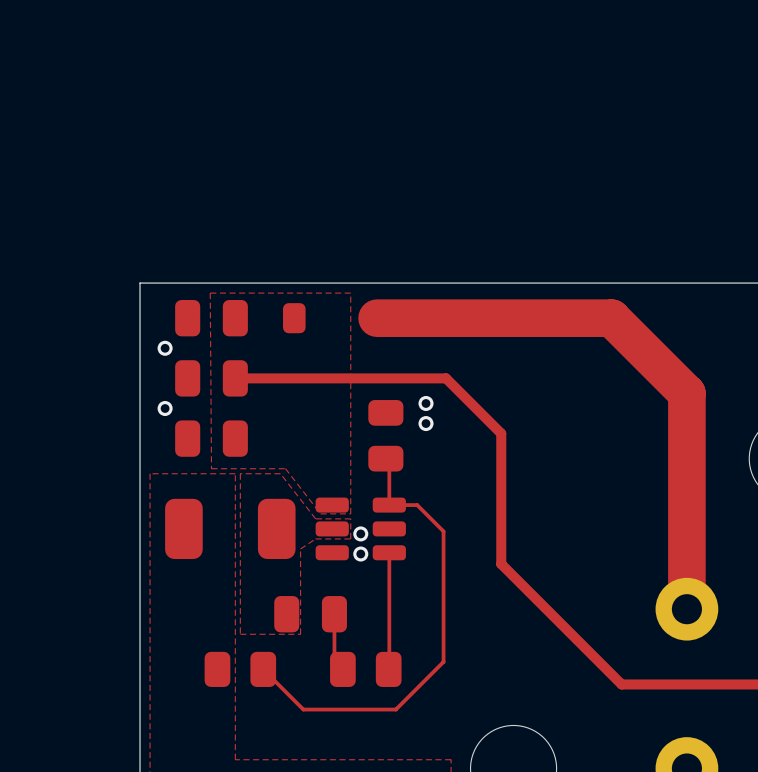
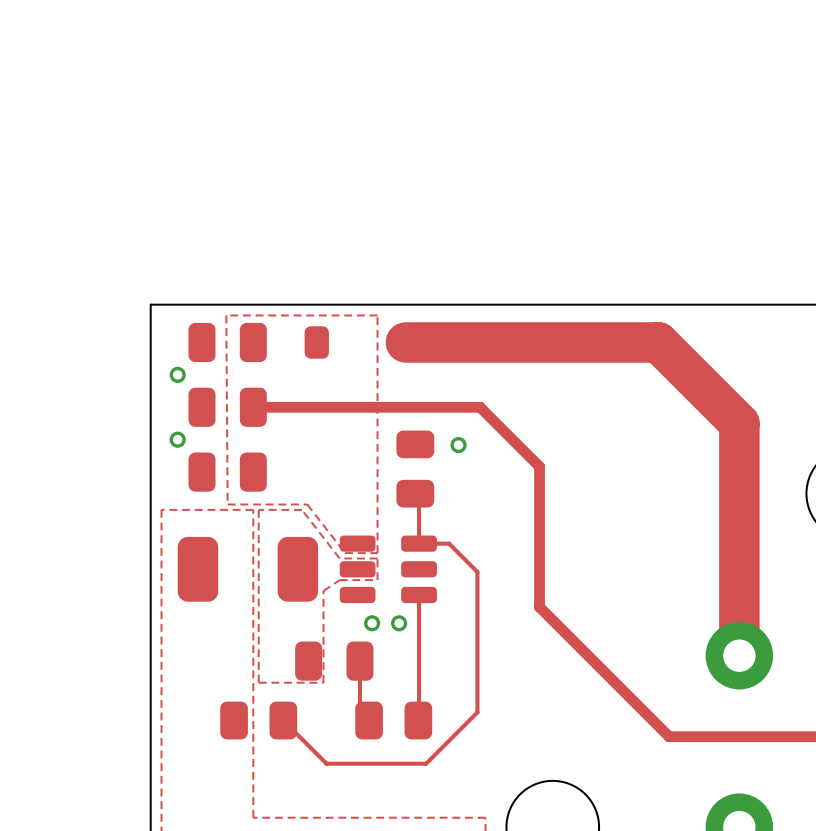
via: (426, 403) -> none
via: none -> (458, 445)
via: (426, 423) -> none
via: (360, 533) -> none
via: (360, 554) -> none
via: none -> (372, 623)
via: none -> (399, 623)

